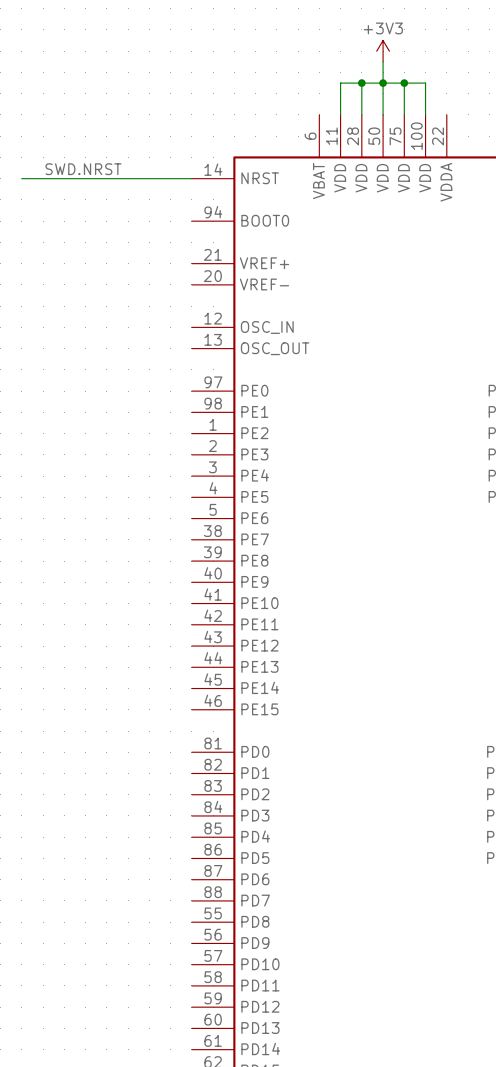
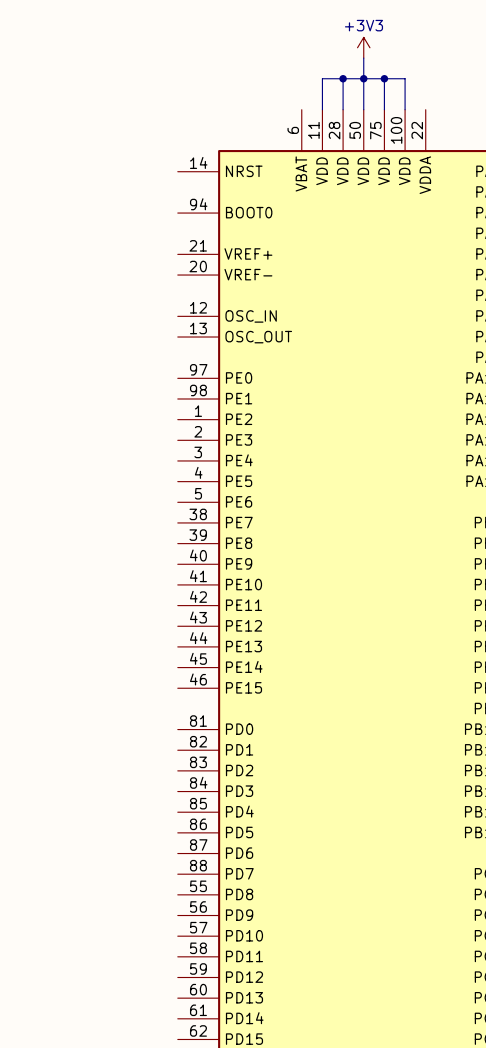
label: SWD.NRST (83, 169) -> none
wire: (21, 178) (191, 178) -> none

